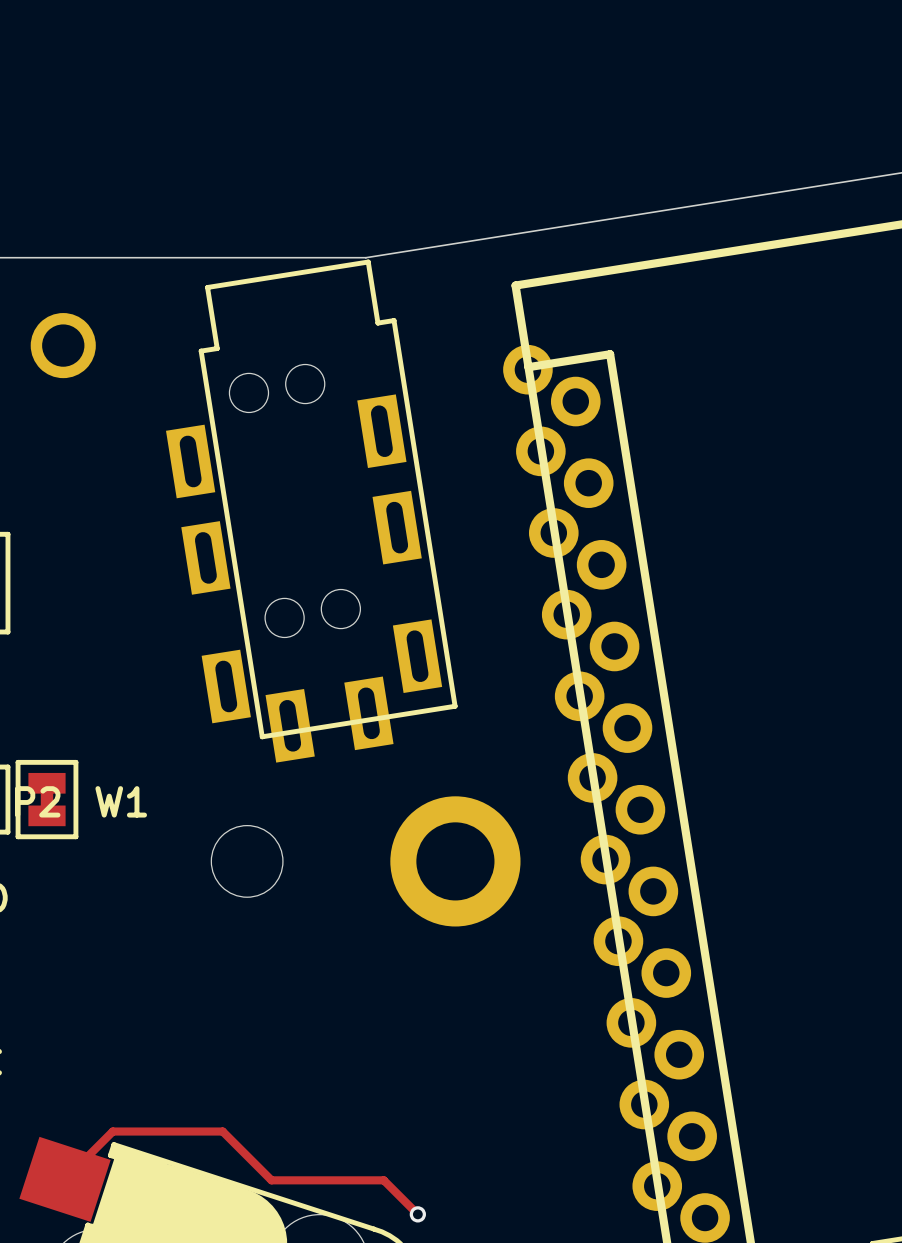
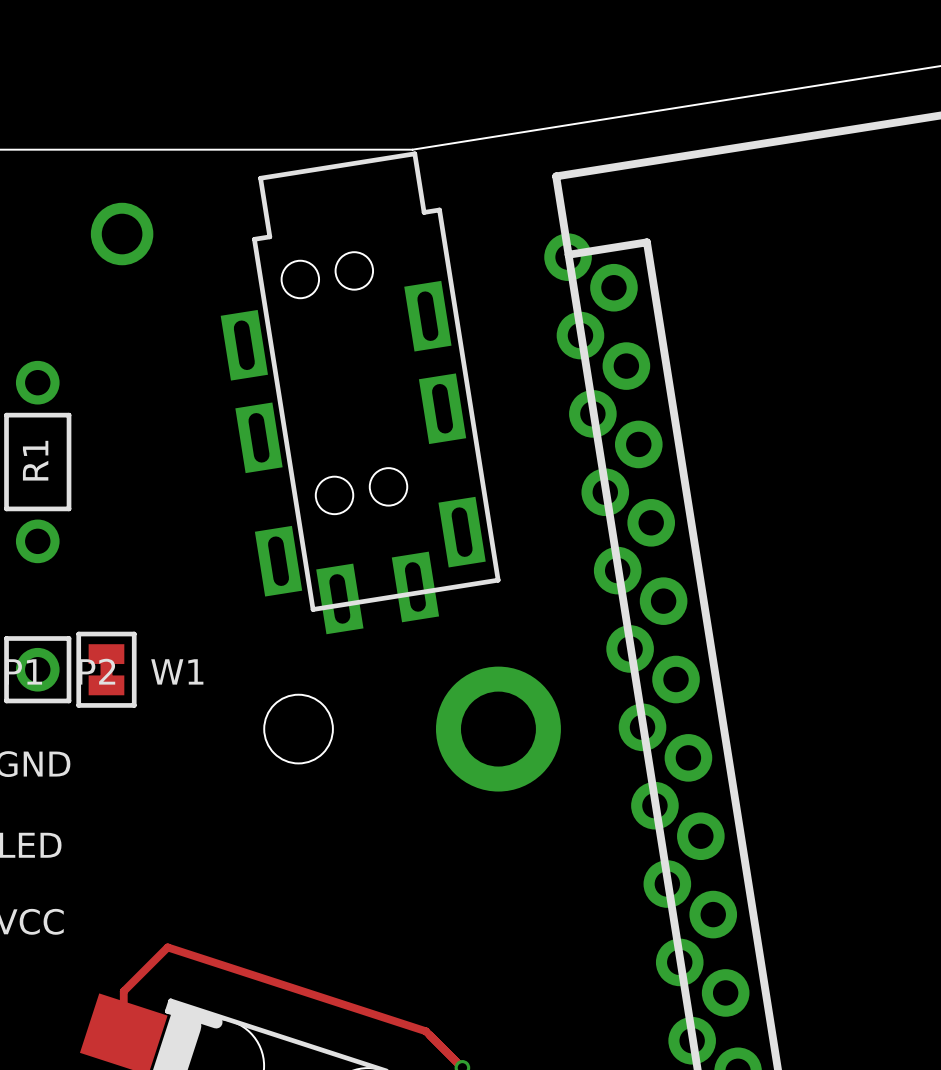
track: (65, 1179) (112, 1131) (222, 1131) (271, 1180) (383, 1180) -> (123, 1034) (123, 991) (167, 947) (425, 1031) (429, 1035)

